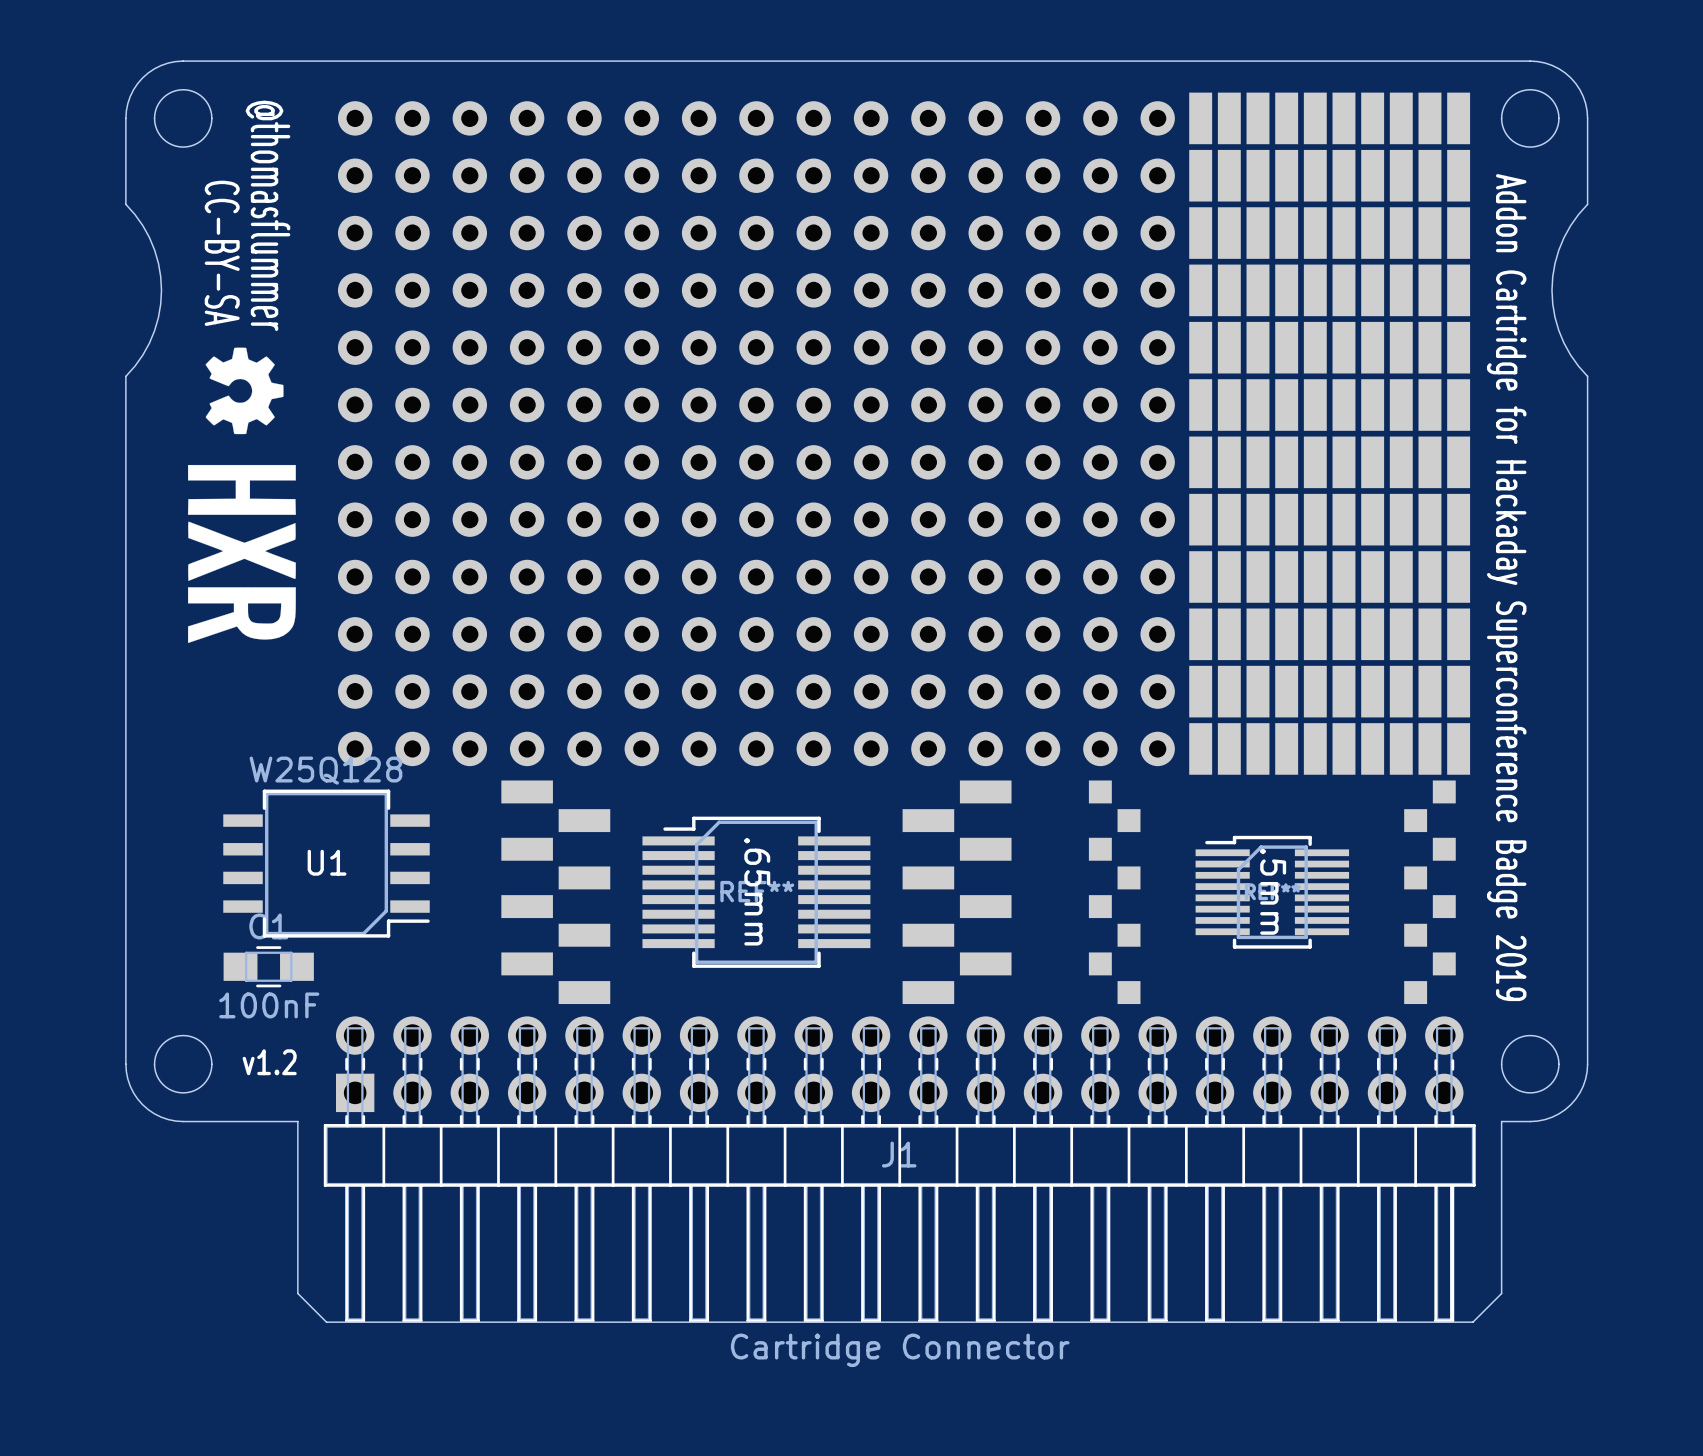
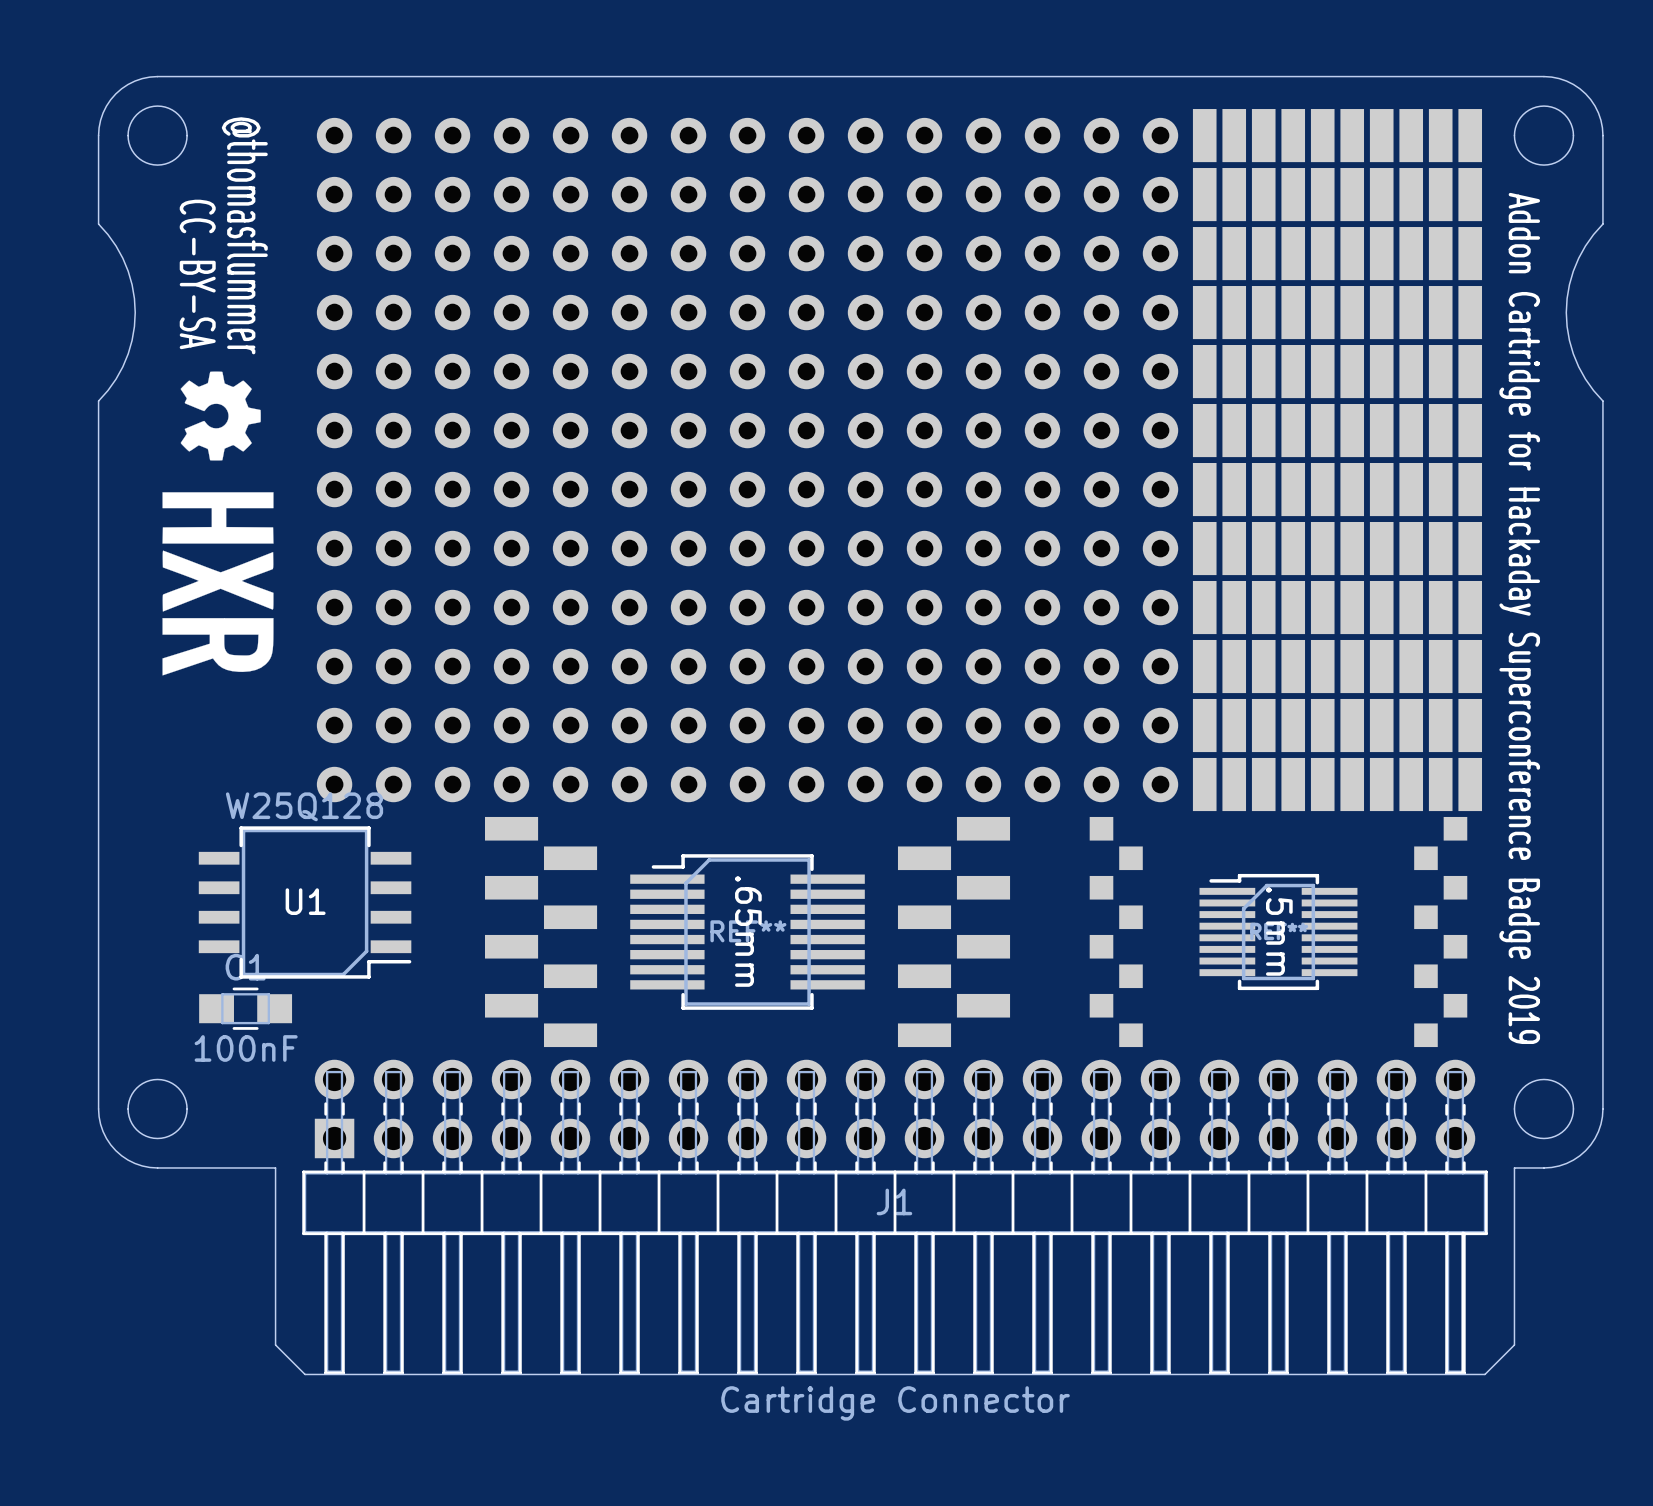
text: v1.2 (269, 1062) -> none

